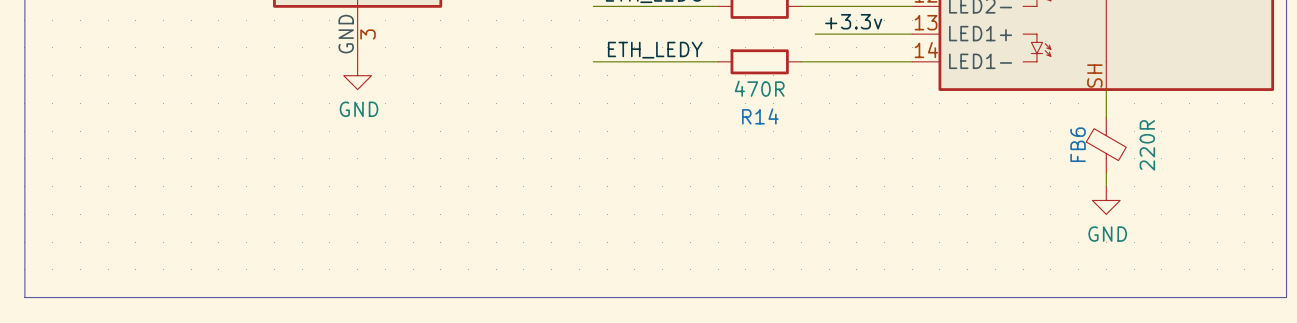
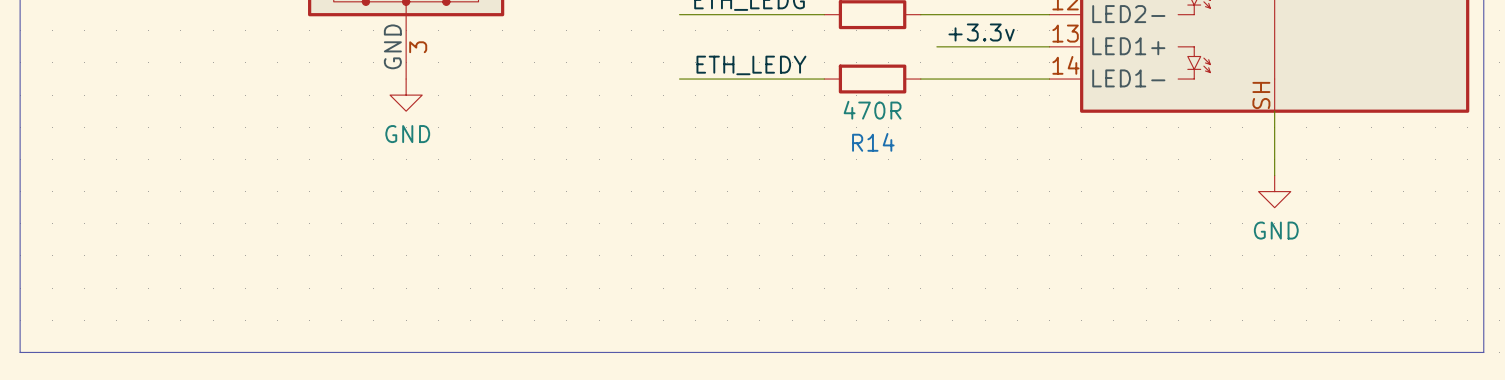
FB6: 220R (1106, 145) -> none
wire: (1106, 172) (1106, 186) -> none
power symbol position: GND (1106, 200) -> GND (1274, 191)

